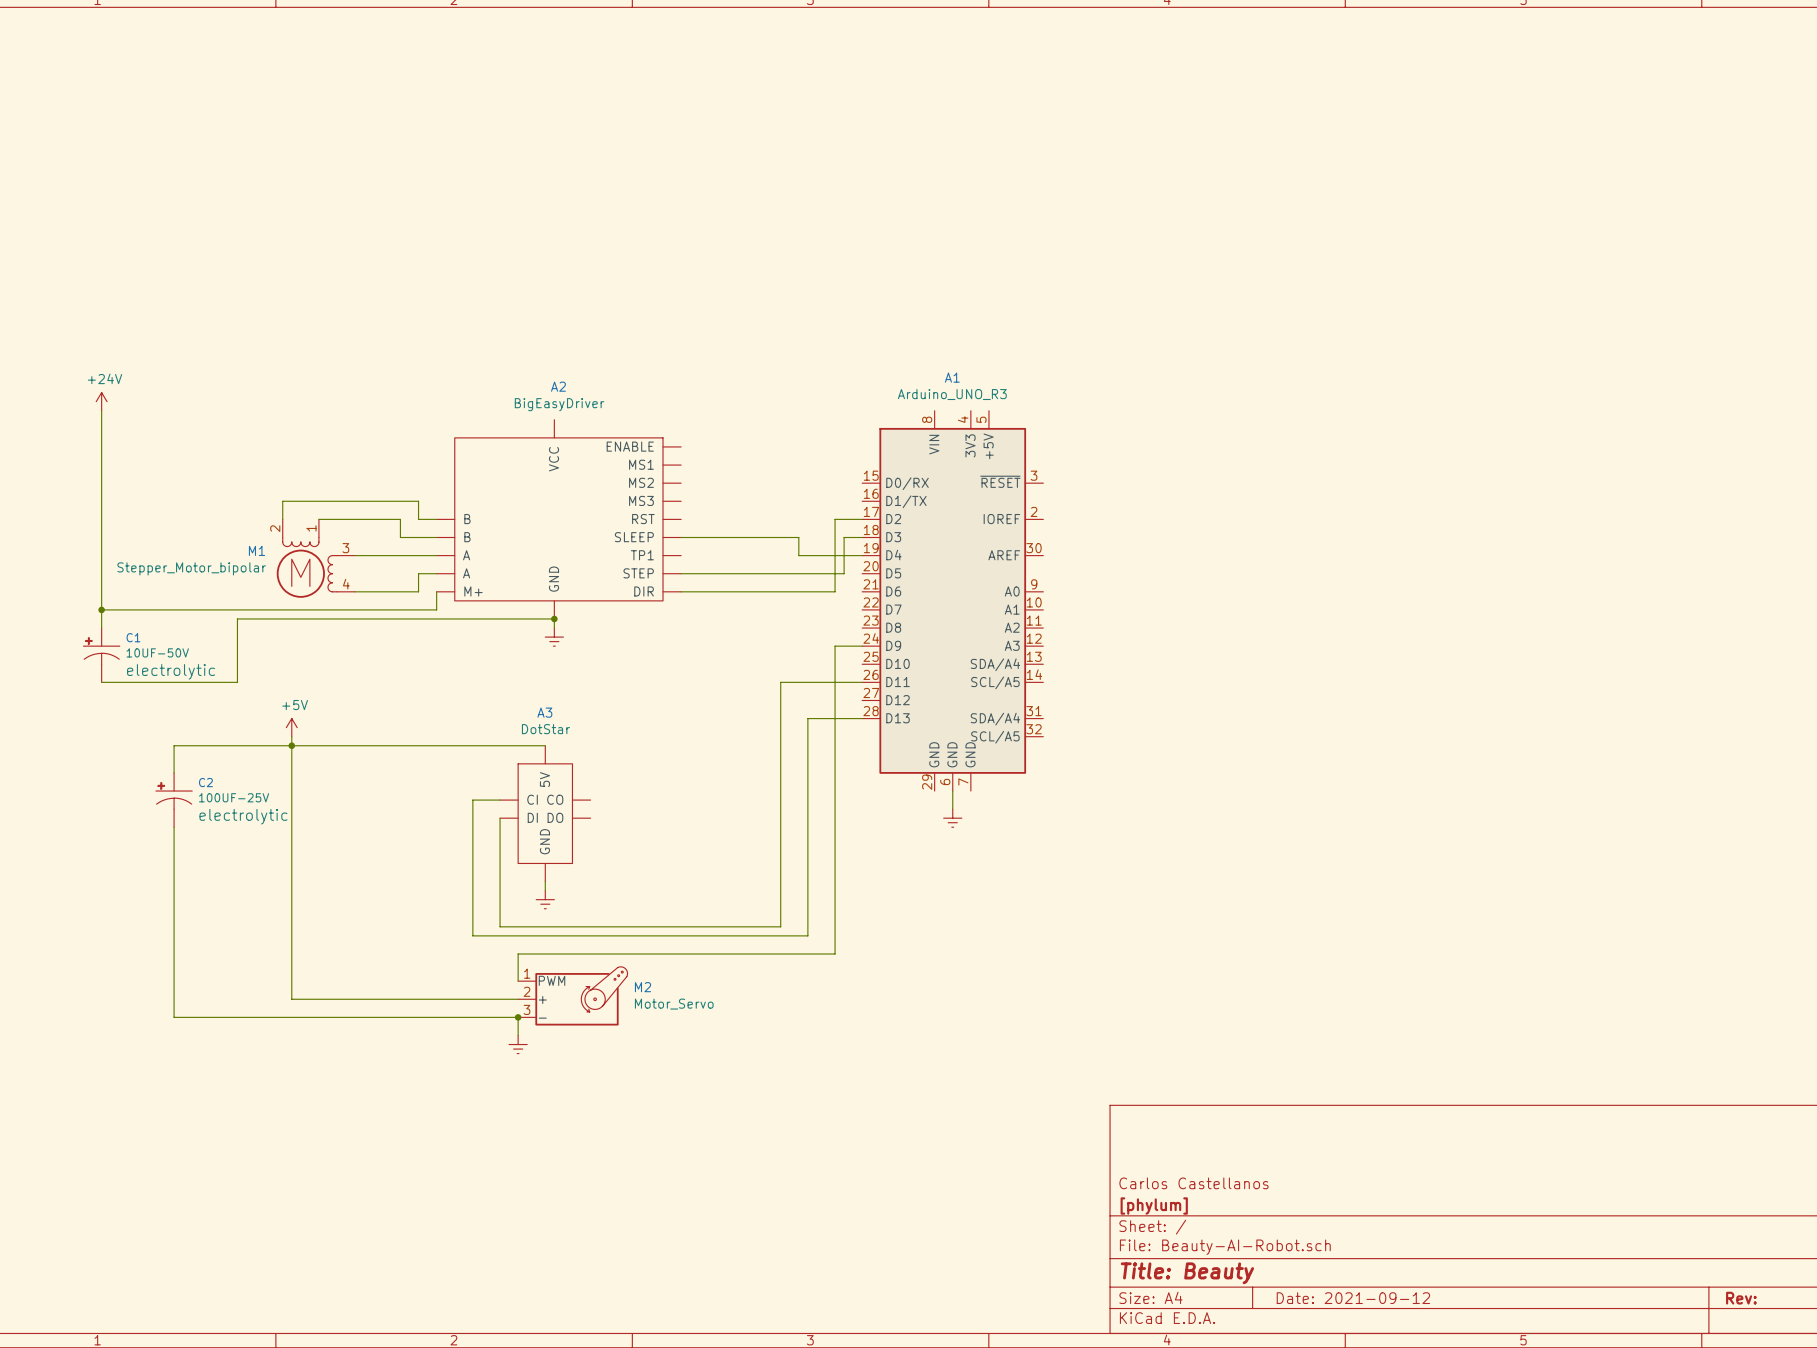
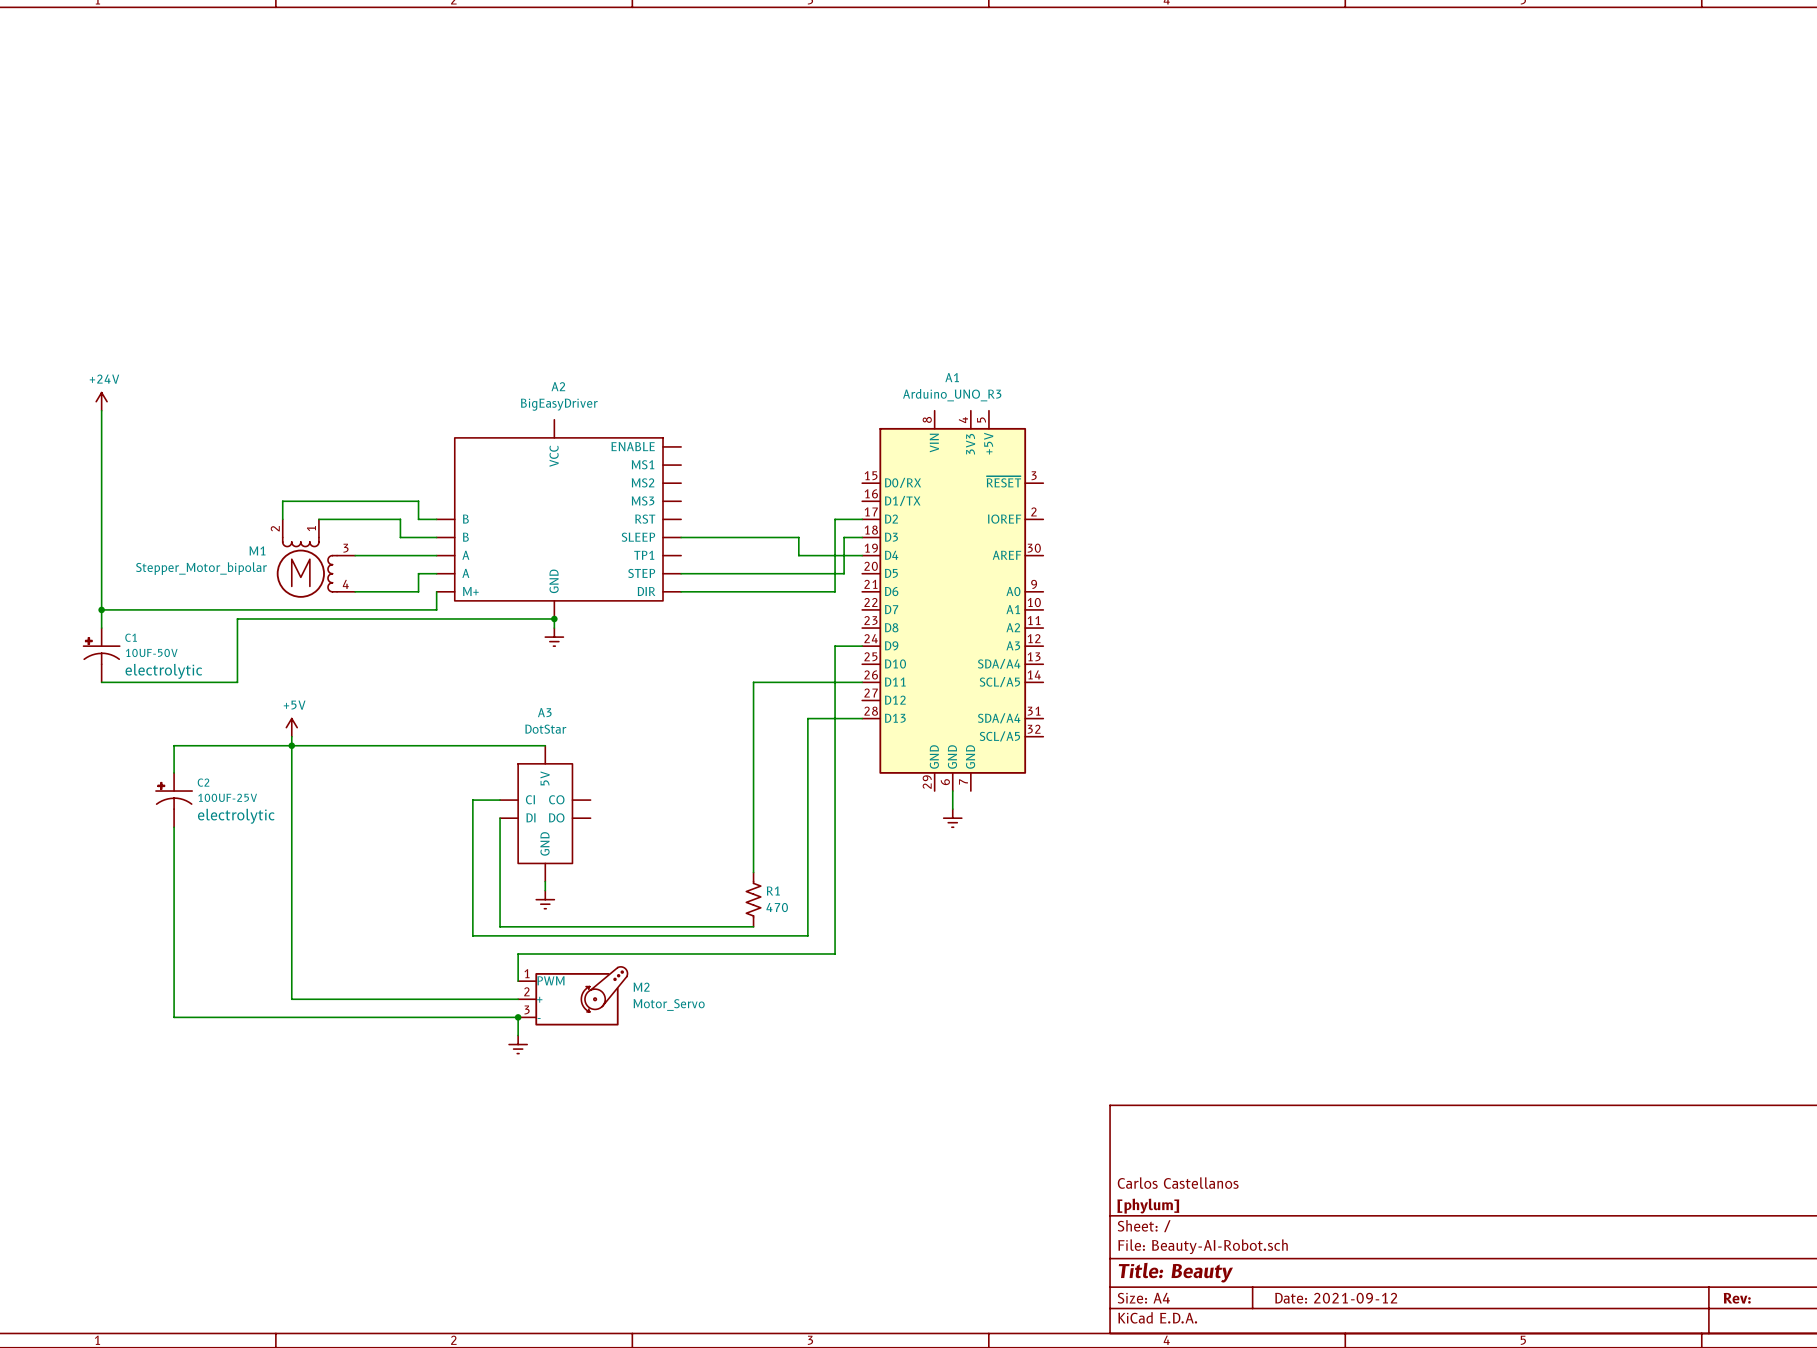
wire: (780, 682) (780, 926) (753, 926) -> (780, 682) (753, 682) (753, 872)
R1: none -> 470 (753, 899)

